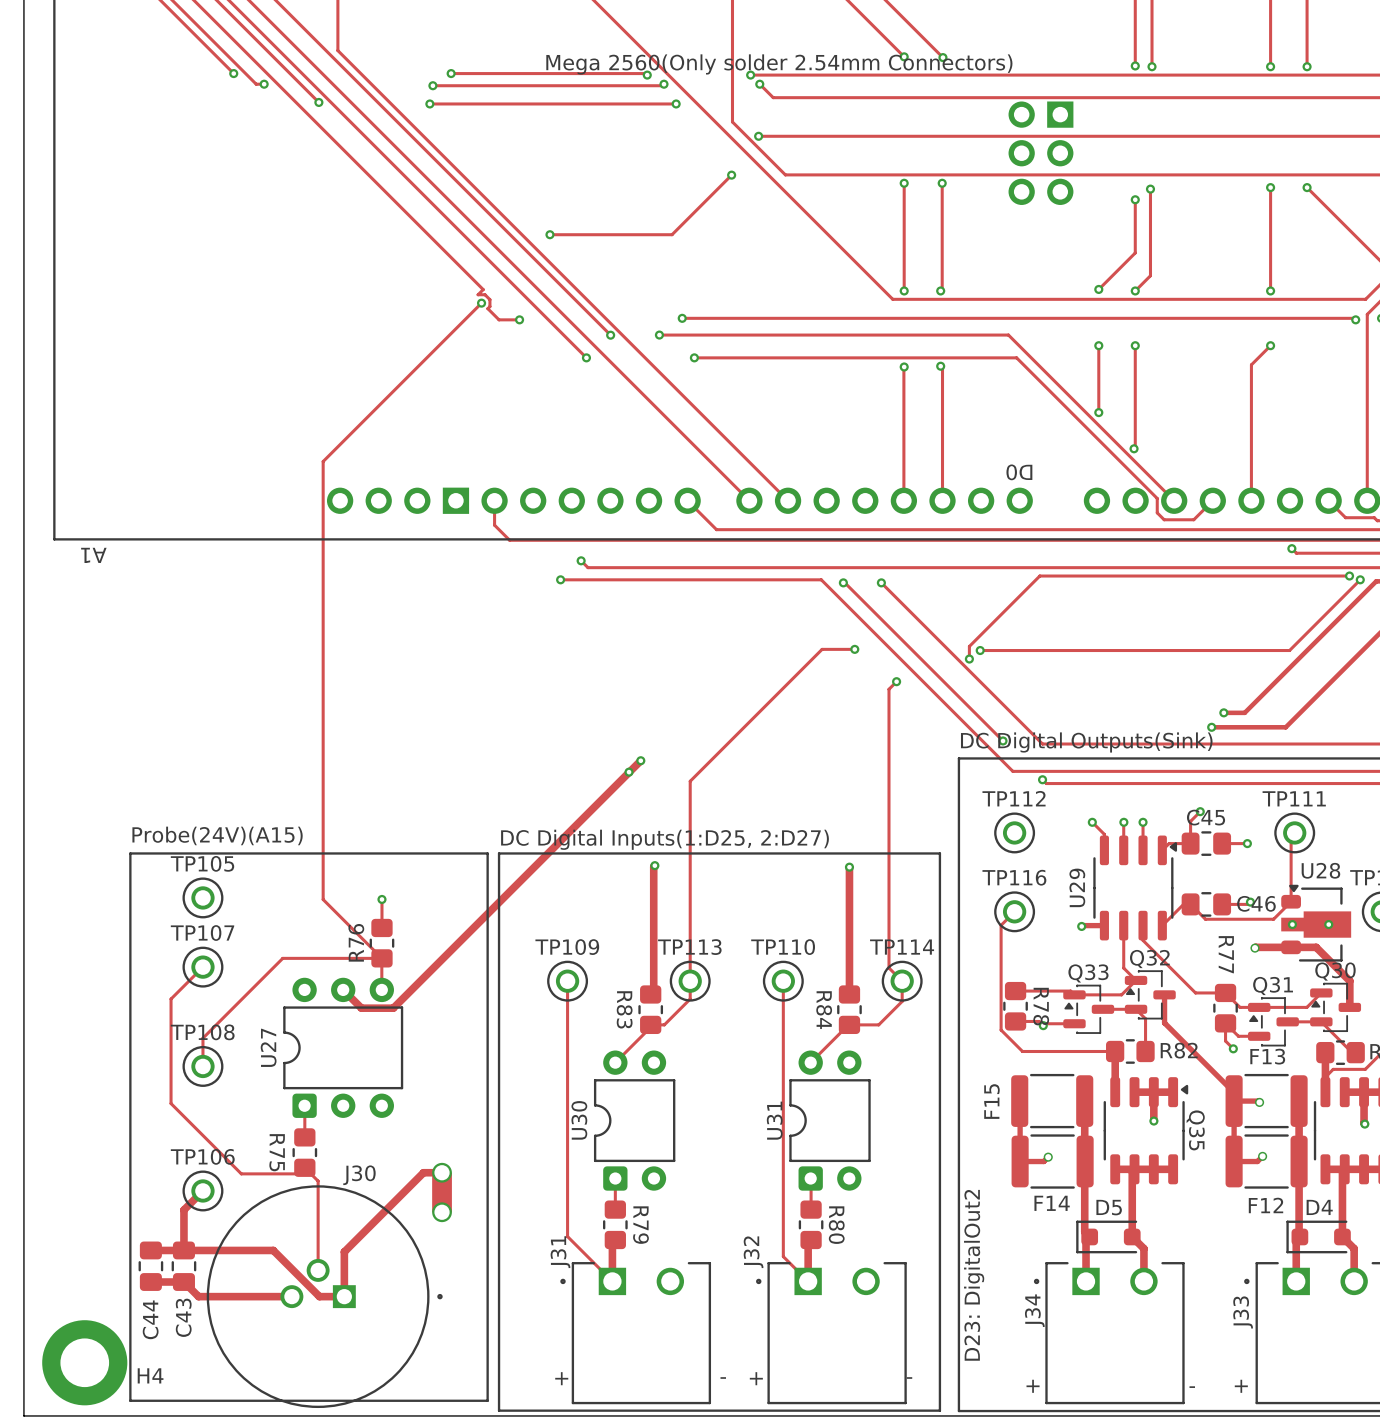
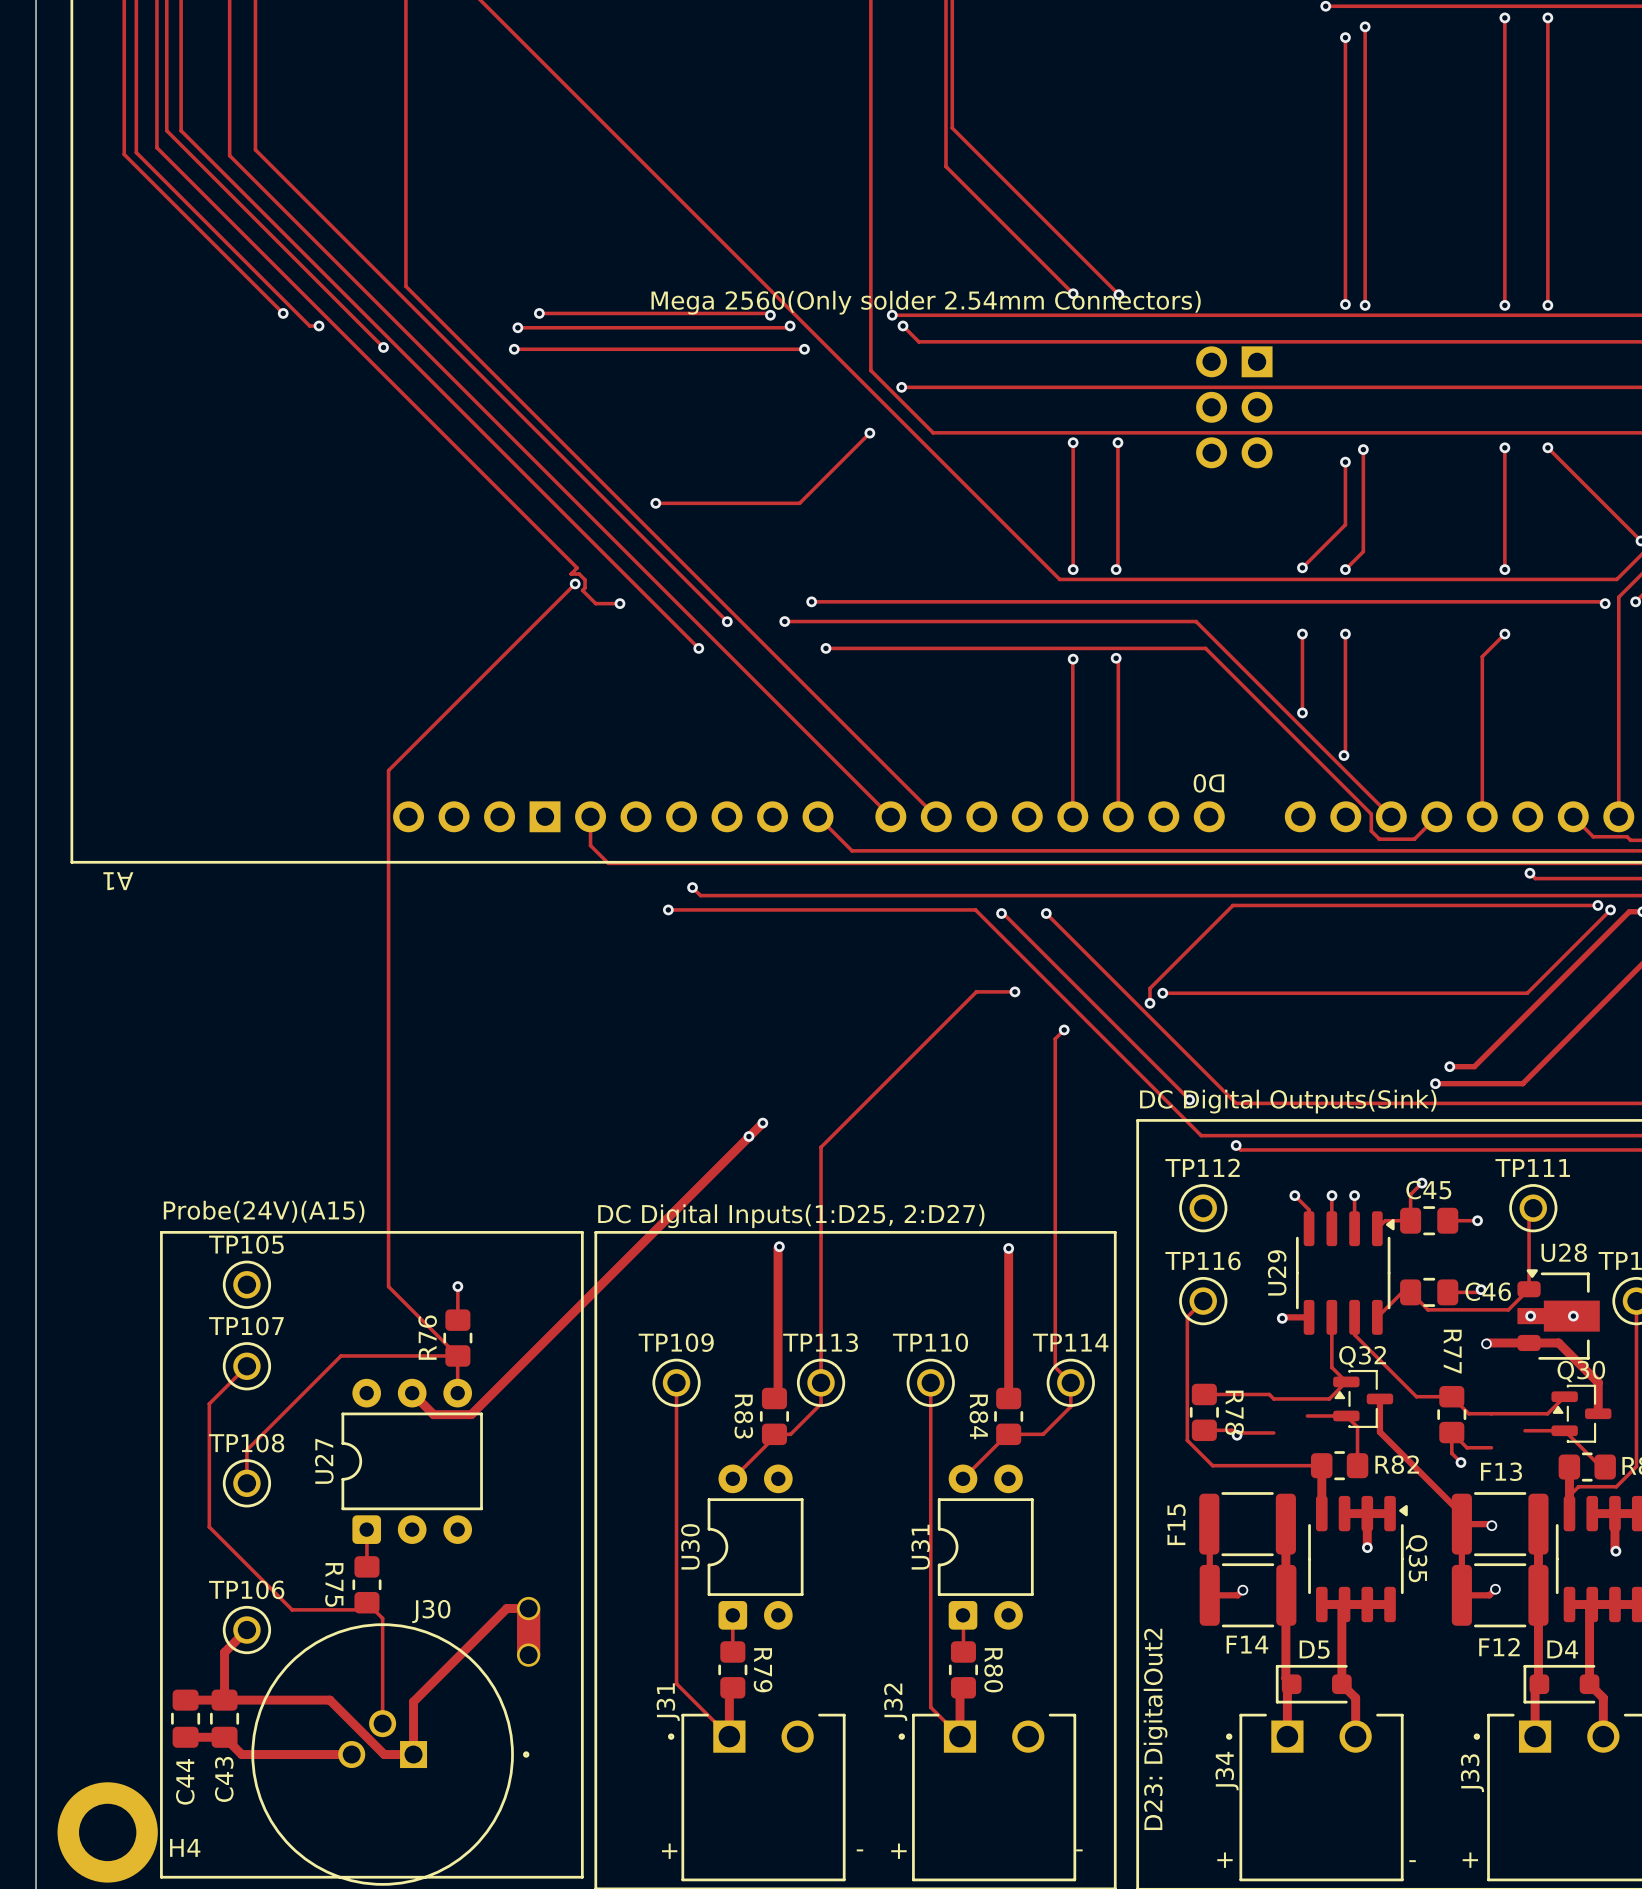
Q33: (1088, 1009) -> none
Q31: (1273, 1021) -> none

